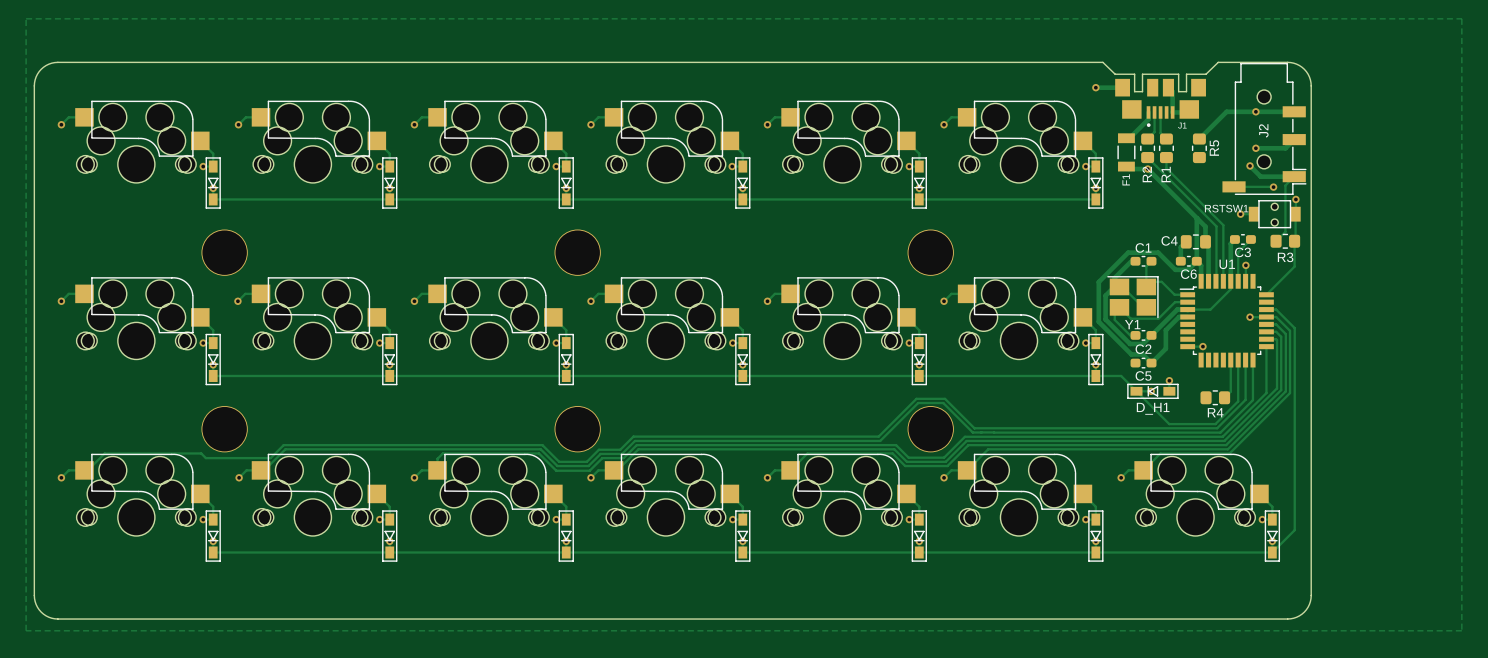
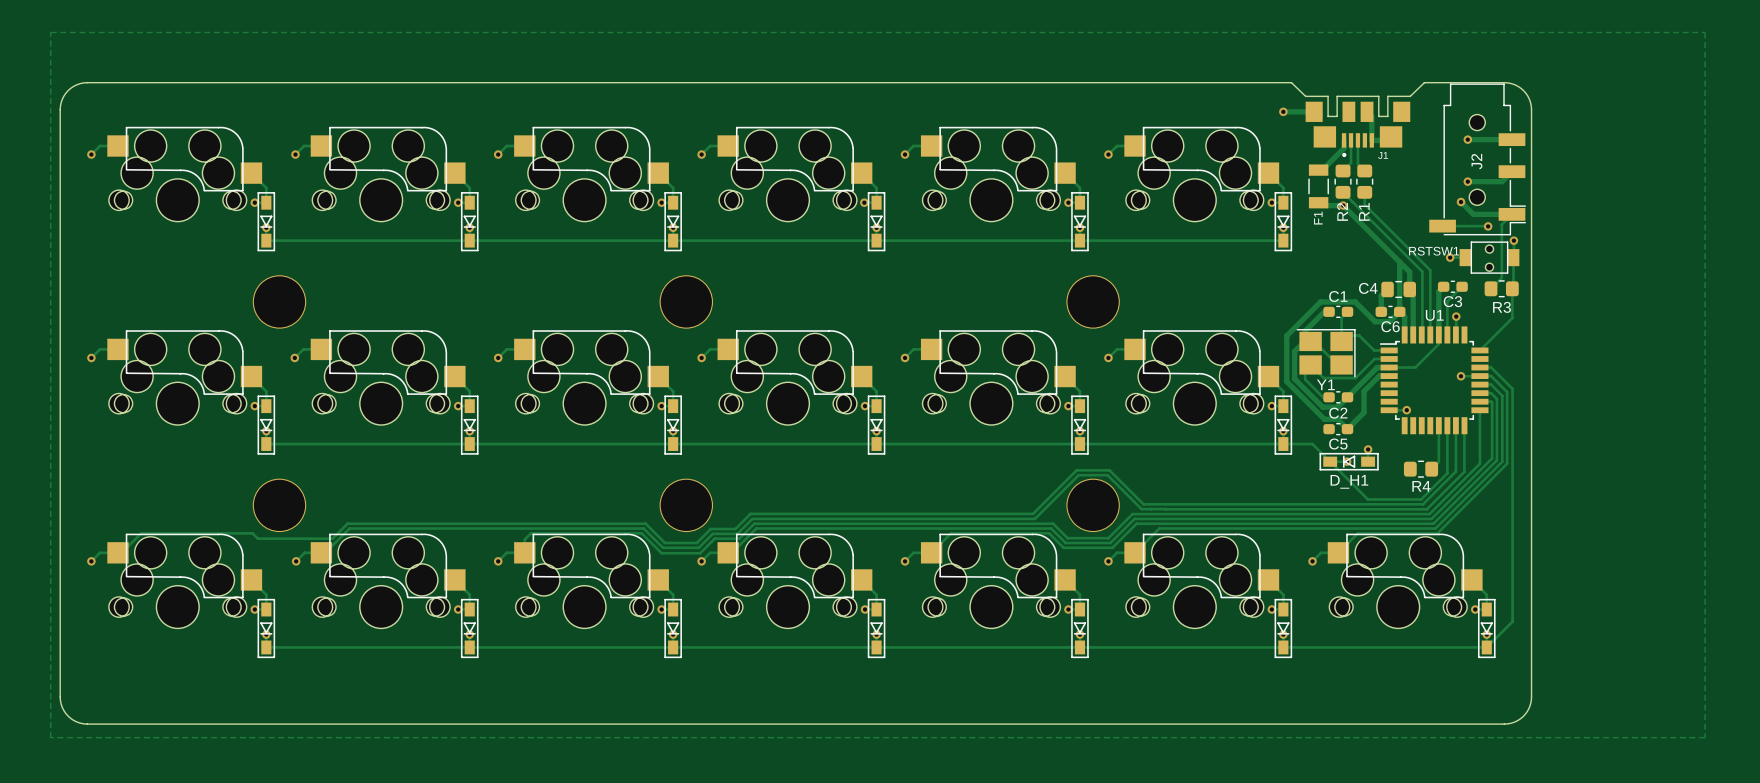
track: (1255, 111) (1226, 111) (1199, 139) -> none
R5: (1199, 148) -> none

